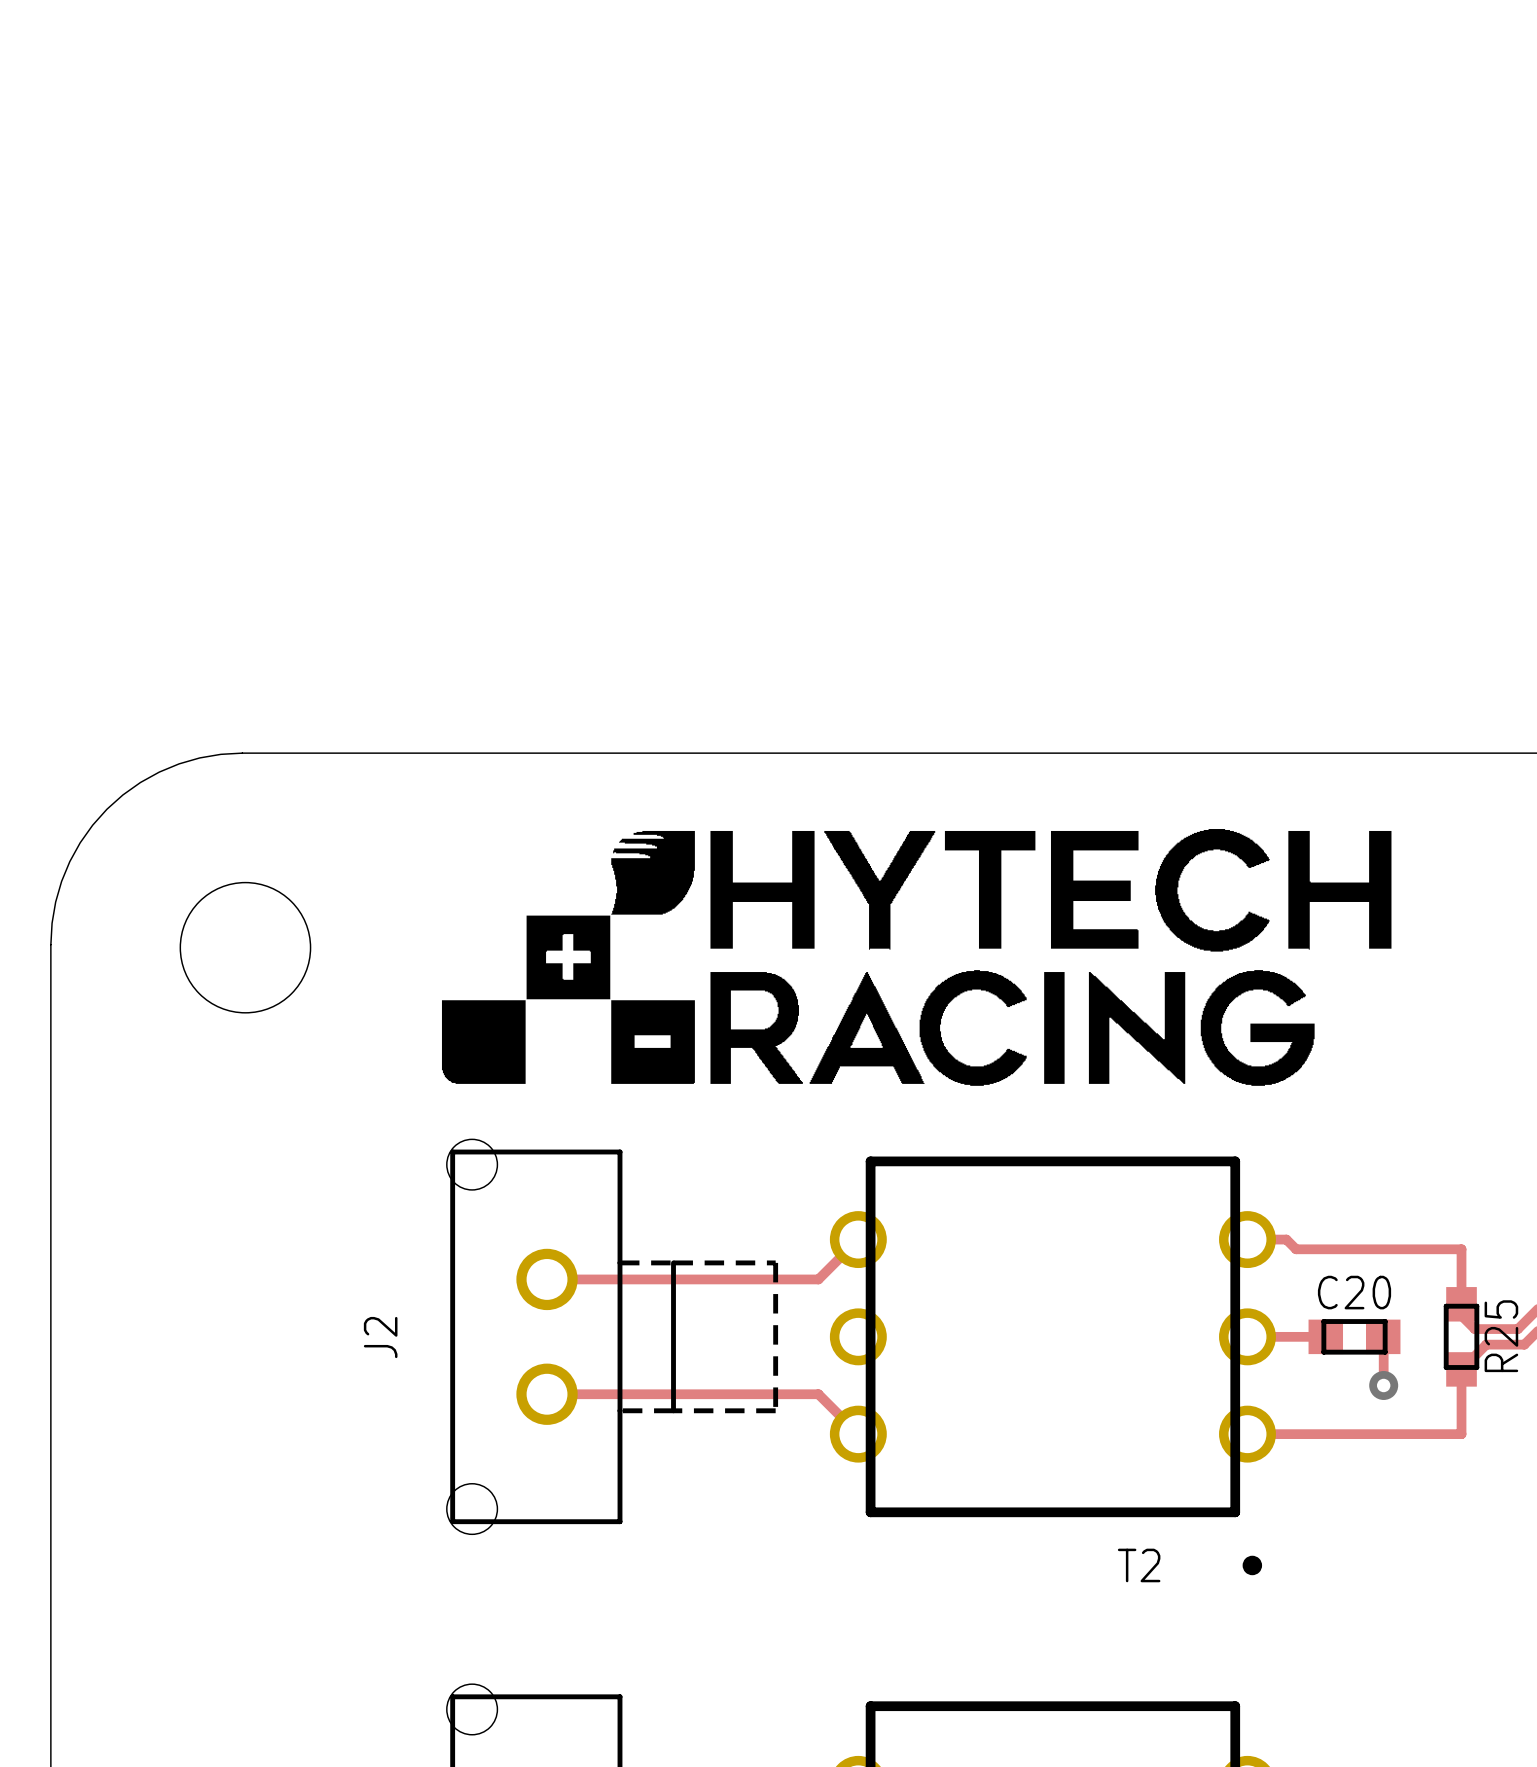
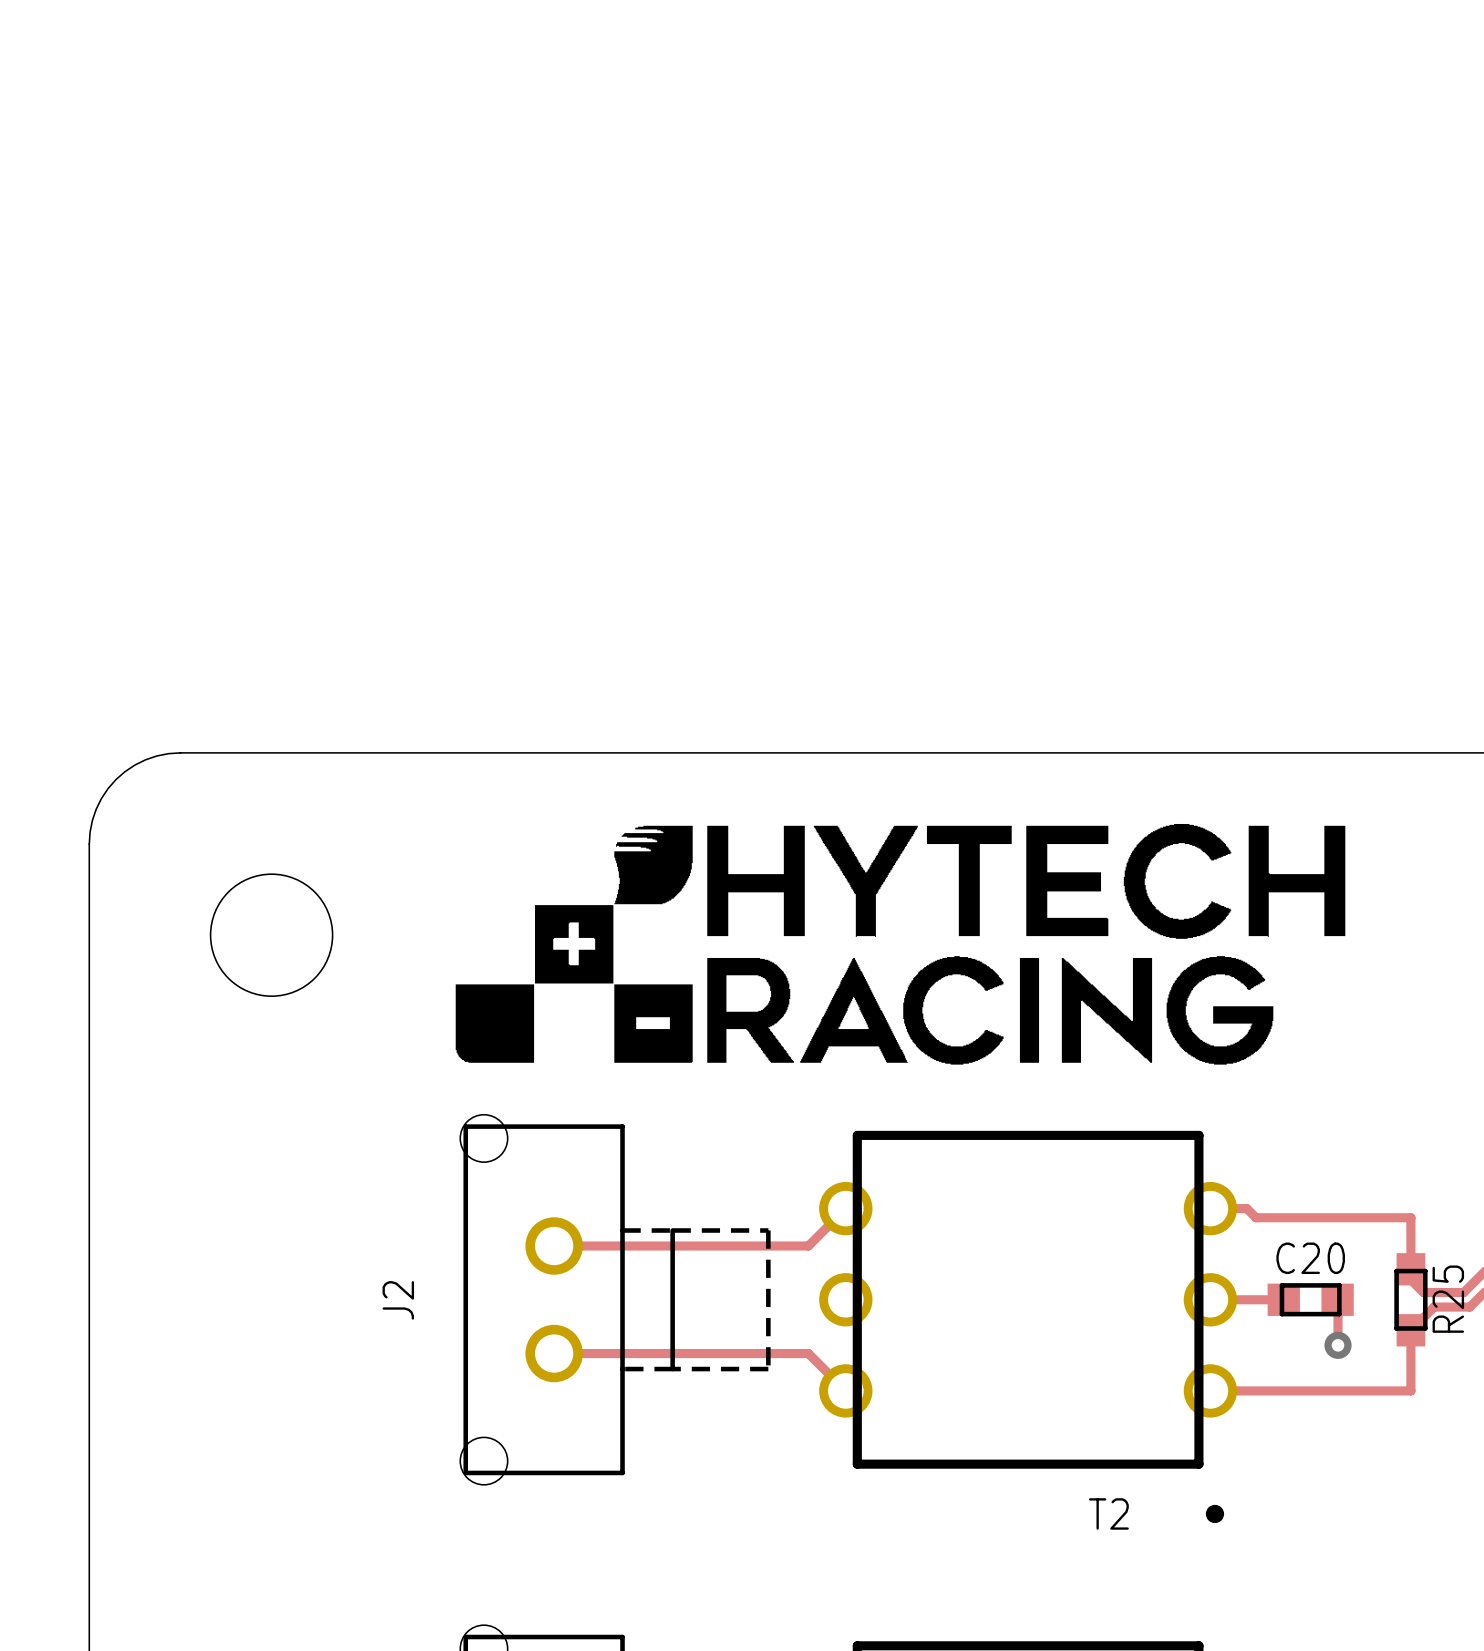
board edge: (242, 753) (220, 754) (179, 763) (140, 782) (106, 809) (80, 842) (61, 881) (52, 923) (50, 944) -> (268, 752) (168, 753) (145, 759) (124, 771) (115, 779) (108, 788) (96, 809) (90, 832) (89, 932)

